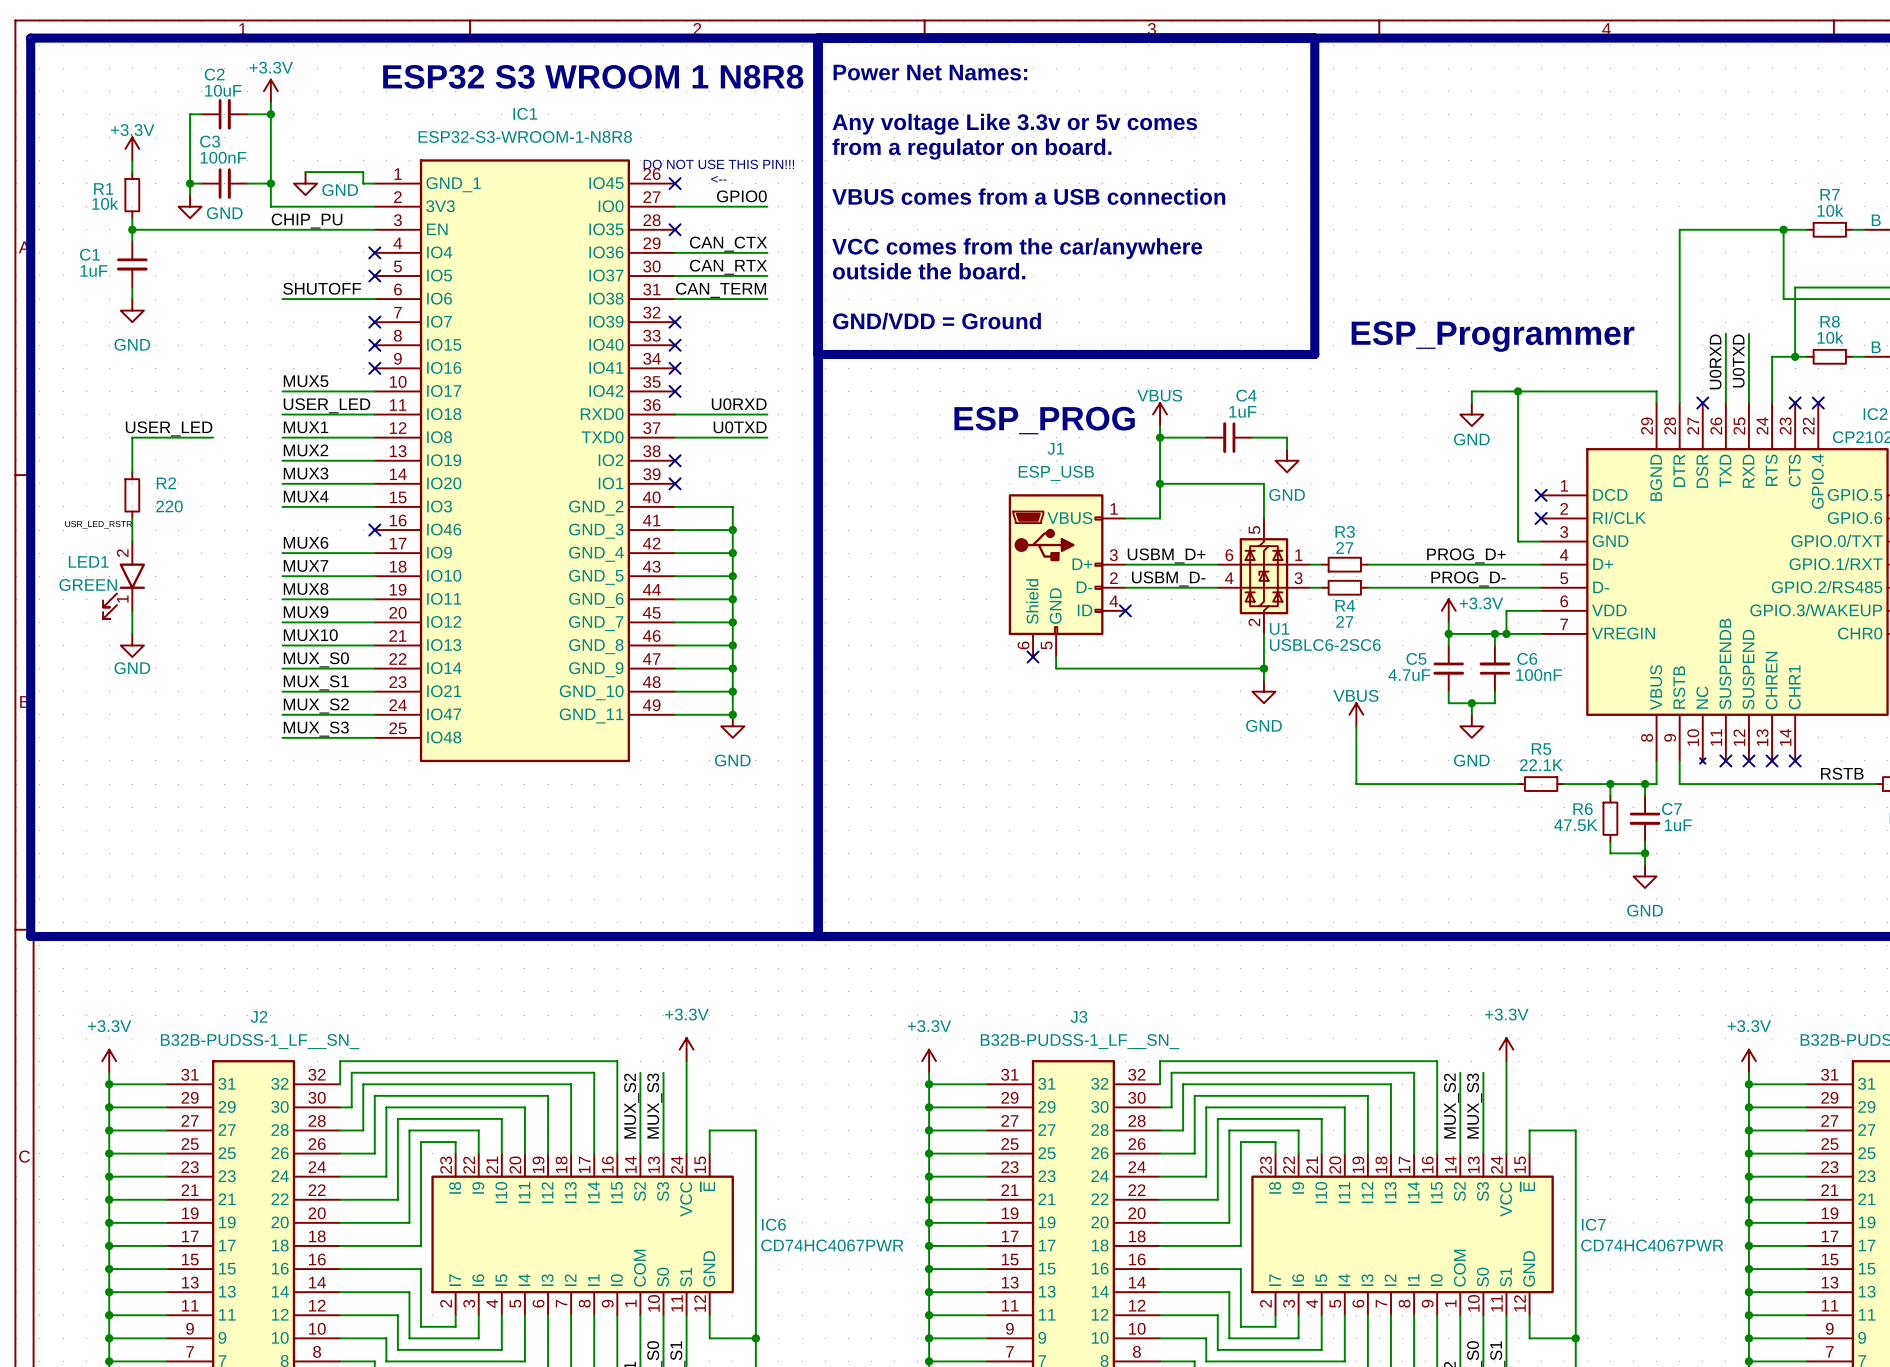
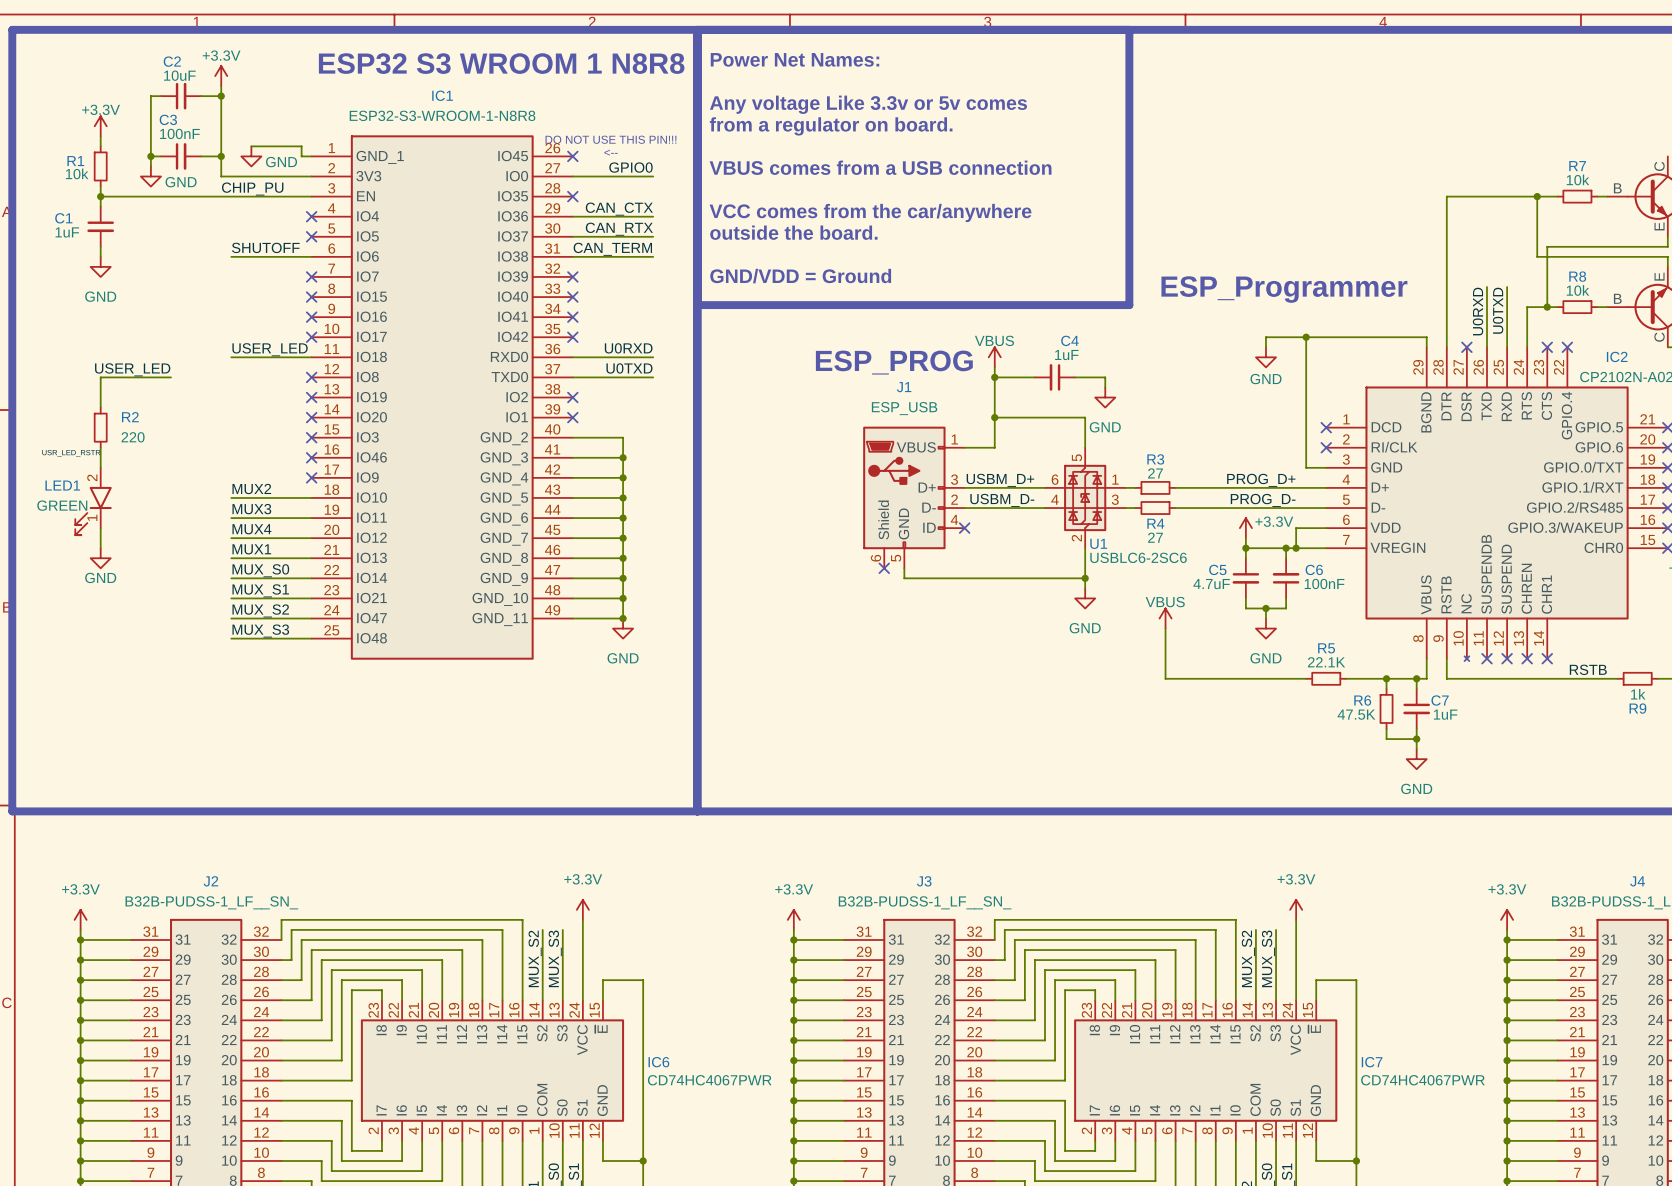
label: MUX5 (306, 381) -> none
wire: (282, 391) (374, 391) -> none
no-connect mark: none -> (311, 337)
label: MUX1 (306, 427) -> none
wire: (282, 437) (374, 437) -> none
no-connect mark: none -> (311, 377)
label: MUX2 (306, 450) -> none
wire: (282, 460) (374, 460) -> none
no-connect mark: none -> (311, 397)
label: MUX3 (306, 473) -> none
wire: (282, 483) (374, 483) -> none
no-connect mark: none -> (311, 417)
label: MUX4 (306, 496) -> none
wire: (282, 506) (374, 506) -> none
no-connect mark: none -> (311, 437)
label: MUX6 (306, 542) -> none
wire: (282, 553) (374, 553) -> none
no-connect mark: none -> (311, 477)
label: MUX7 (306, 565) -> MUX2 (251, 489)
label: MUX8 (306, 588) -> MUX3 (251, 509)
label: MUX9 (306, 612) -> MUX4 (251, 529)
label: MUX10 (310, 635) -> MUX1 (251, 549)

